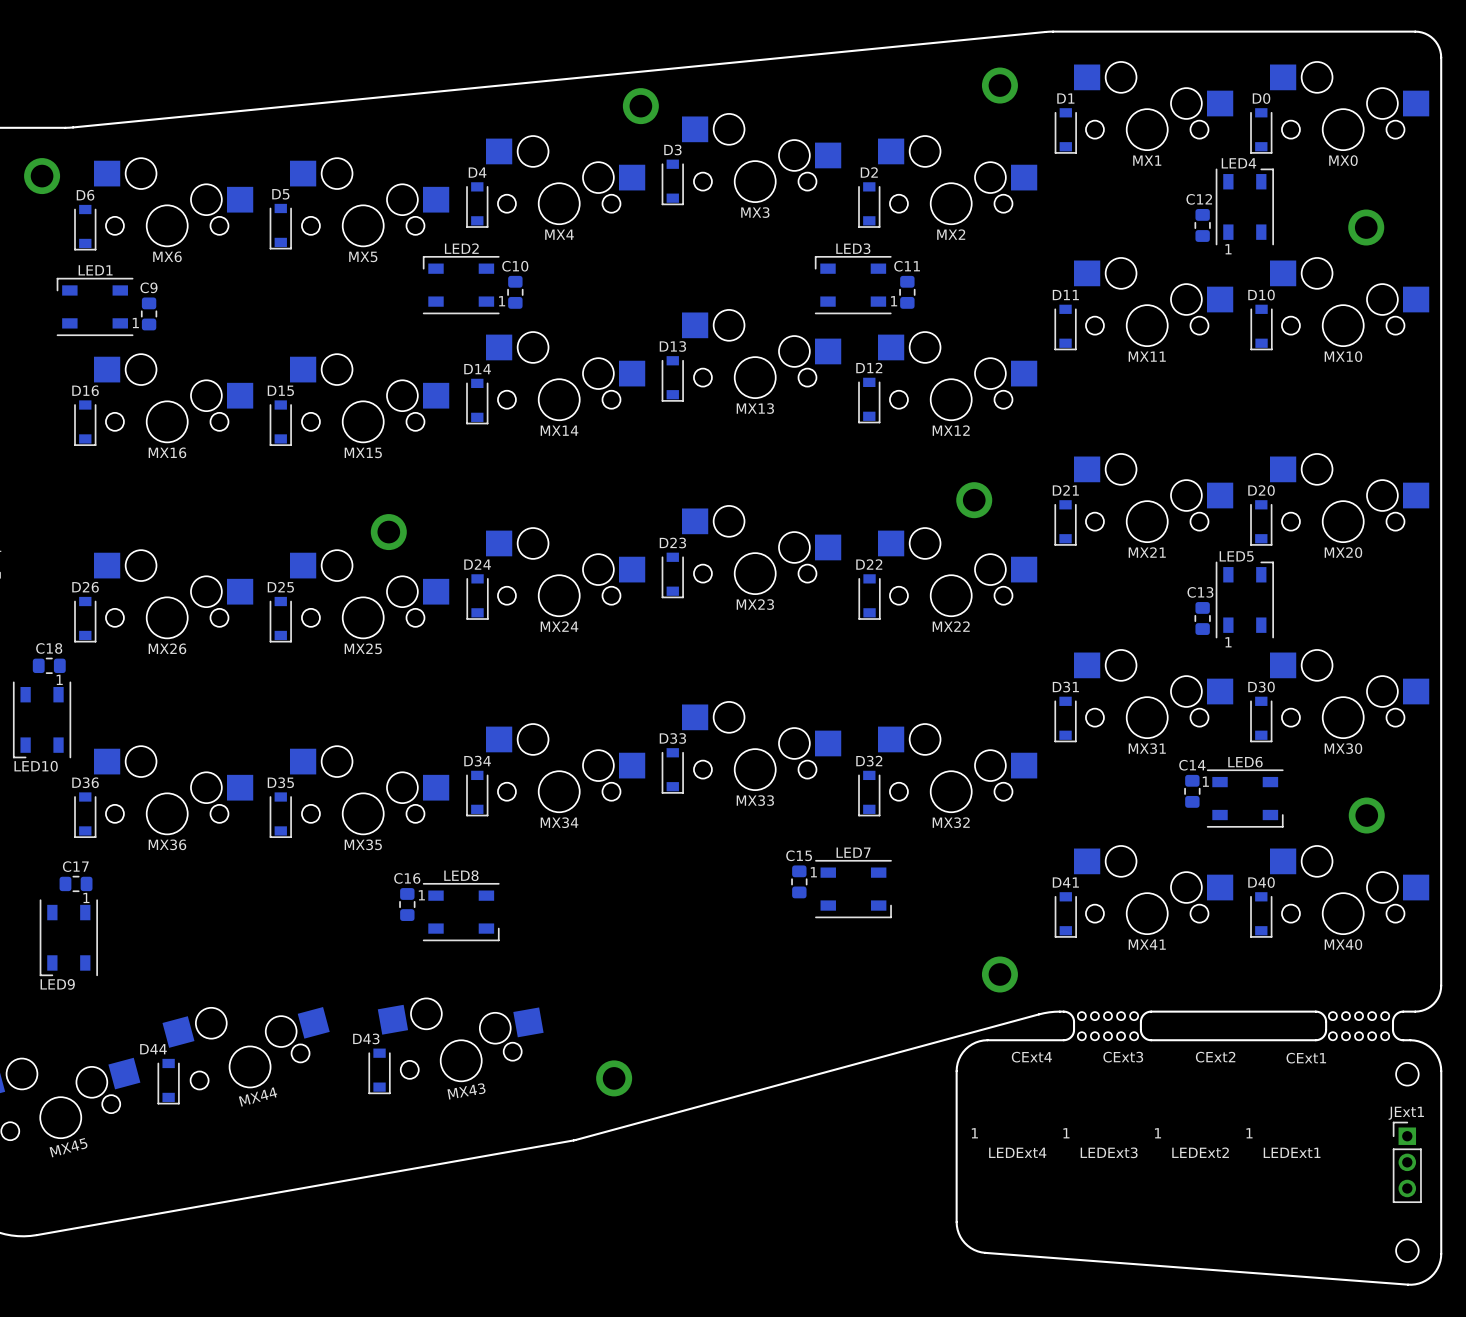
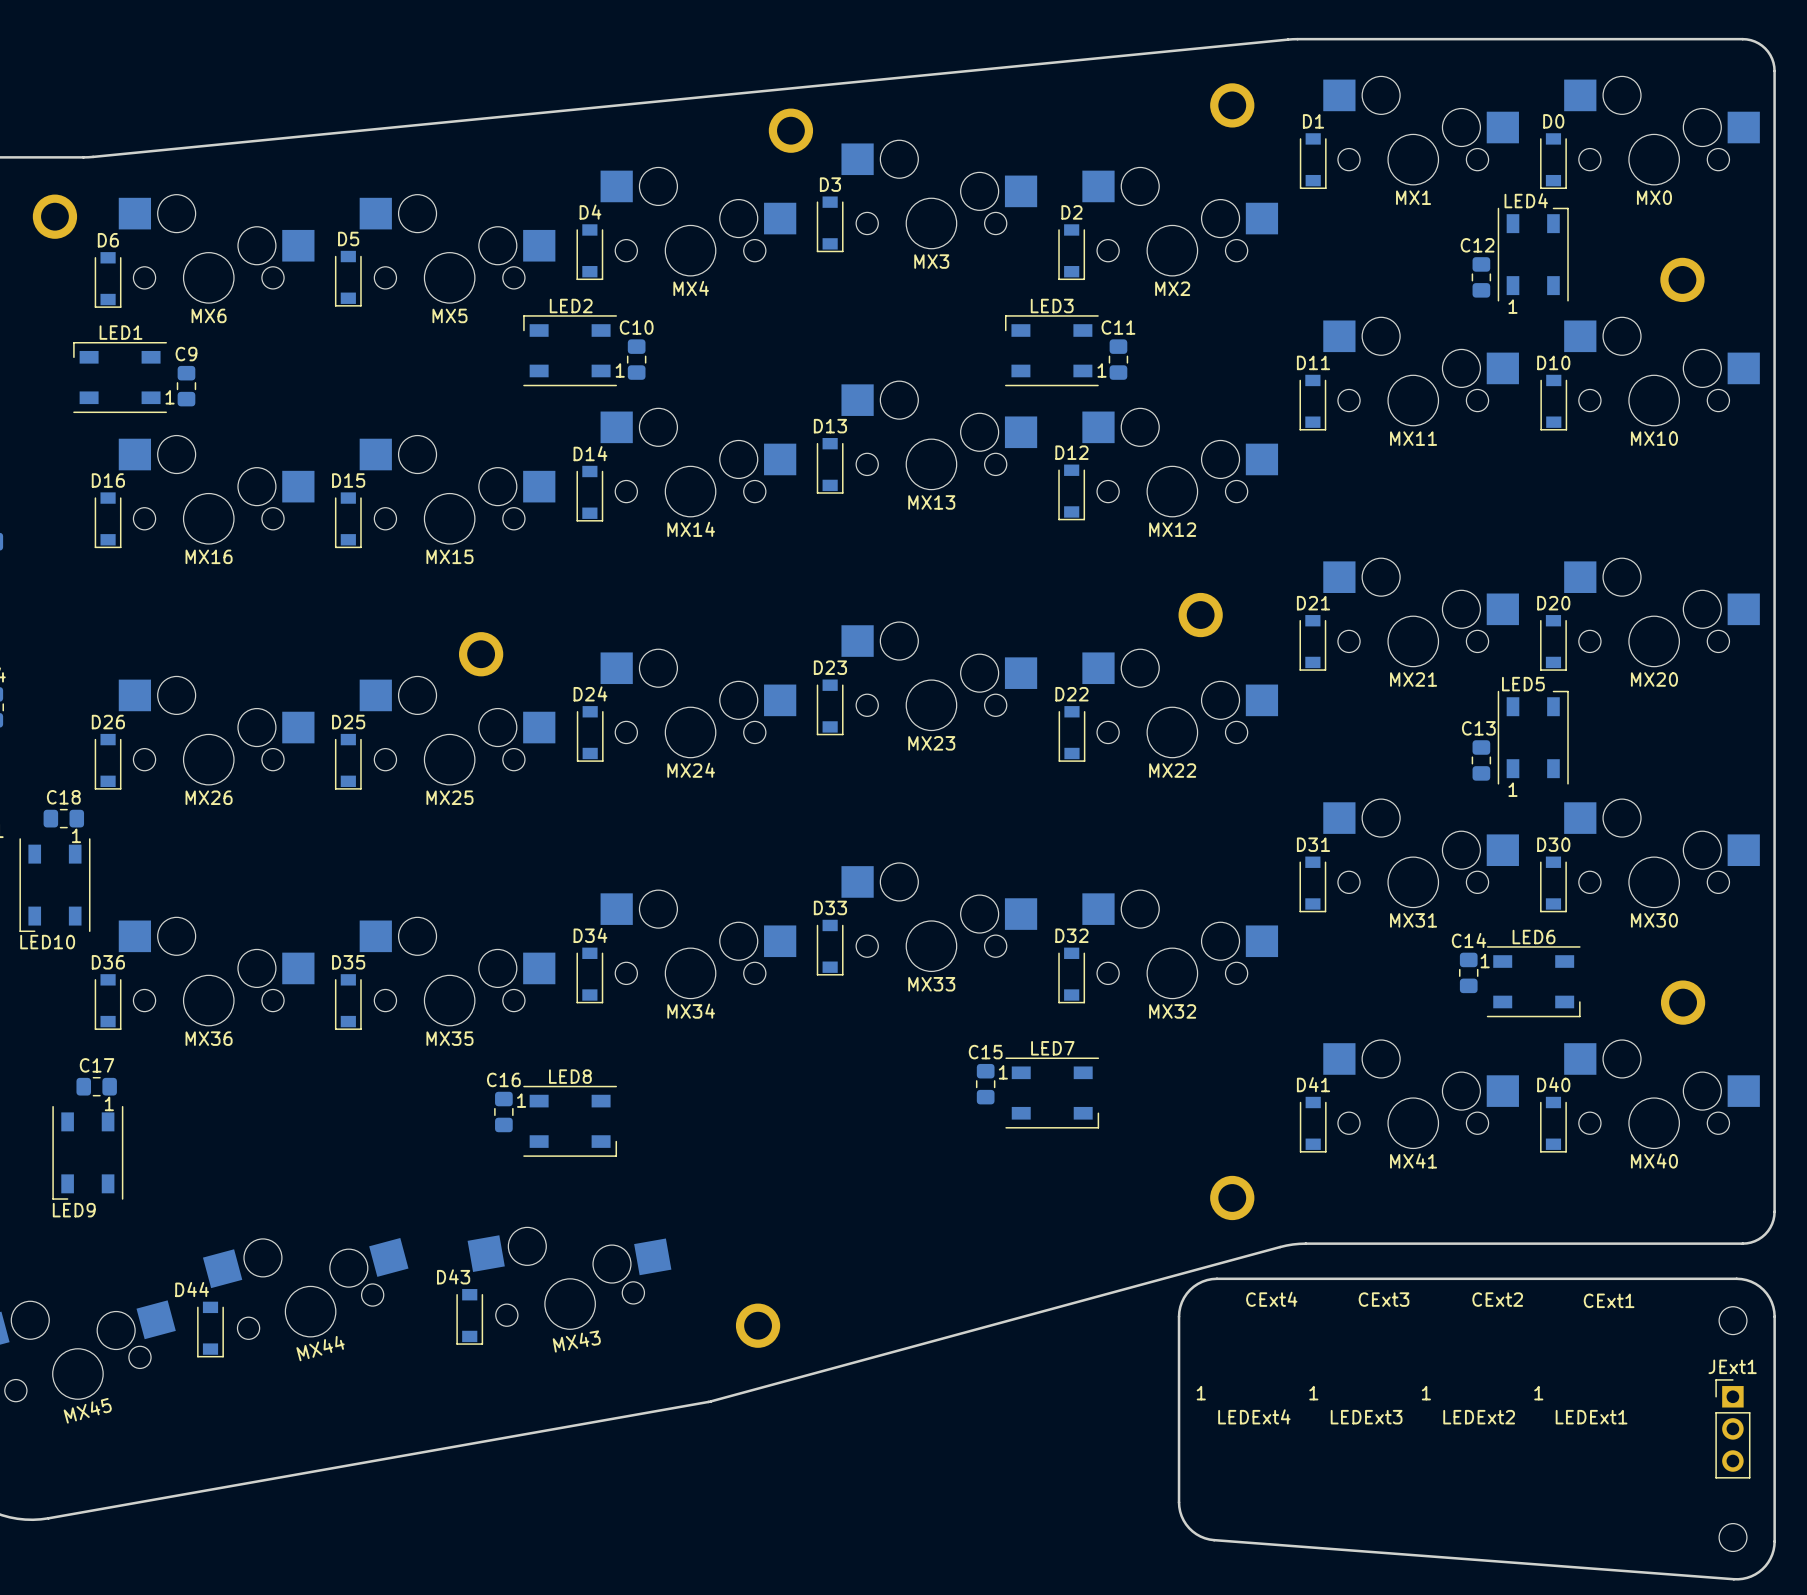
board edge: (1063, 1011) (1071, 1014) (1074, 1021) (1072, 1035) (1063, 1040) -> (1418, 1278) (1310, 1278)
board edge: (1151, 1011) (1143, 1014) (1140, 1021) (1142, 1035) (1151, 1040) -> (1418, 1243) (1310, 1243)
board edge: (1315, 1011) (1323, 1014) (1326, 1021) (1324, 1035) (1315, 1040) -> (1727, 1278) (1620, 1278)
board edge: (1403, 1011) (1396, 1014) (1392, 1021) (1394, 1035) (1403, 1040) -> (1727, 1243) (1620, 1243)
part: (1107, 1016) -> none
part: (1359, 1016) -> none
part: (1107, 1036) -> none
part: (1359, 1036) -> none

